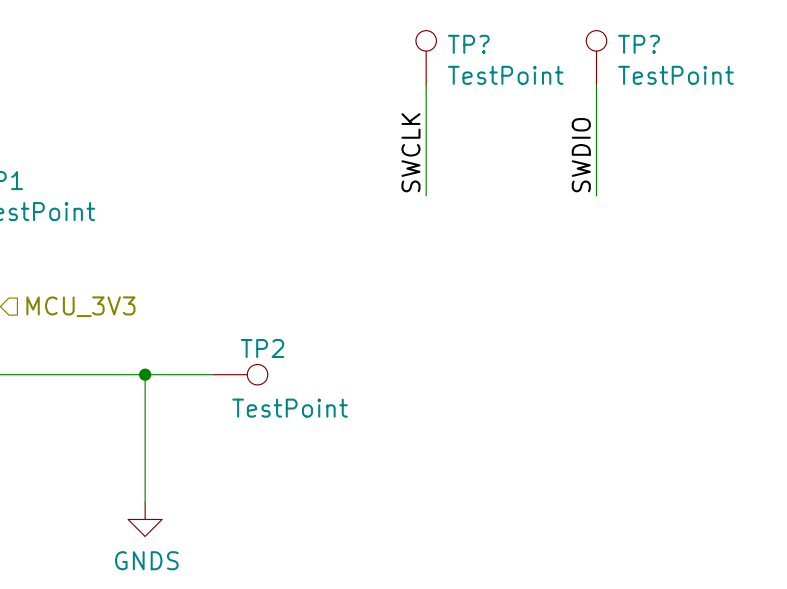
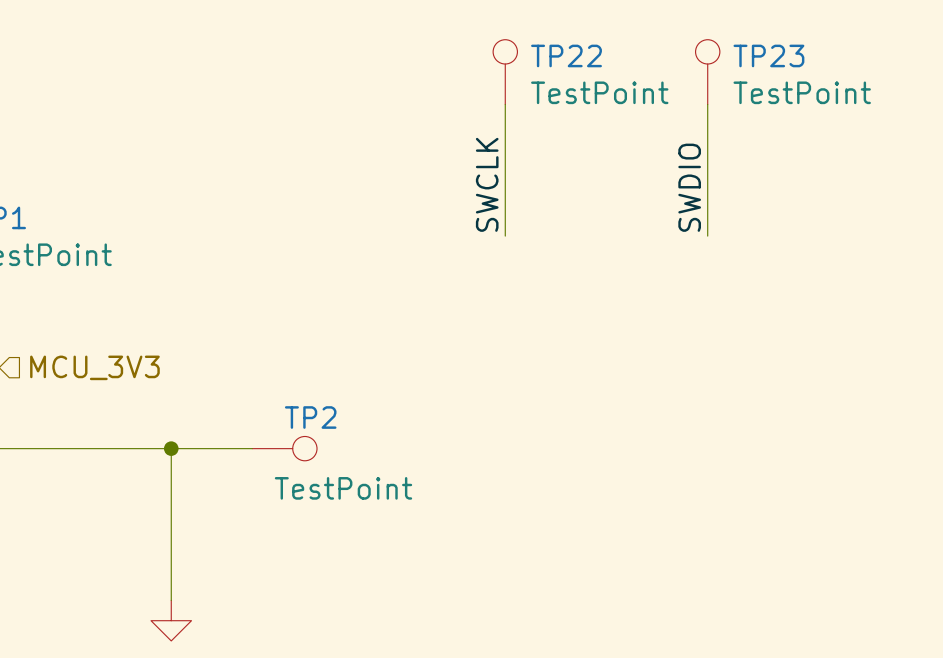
TP? name: TP? (468, 44) -> TP22 (566, 55)
TP? name: TP? (639, 44) -> TP23 (768, 55)

